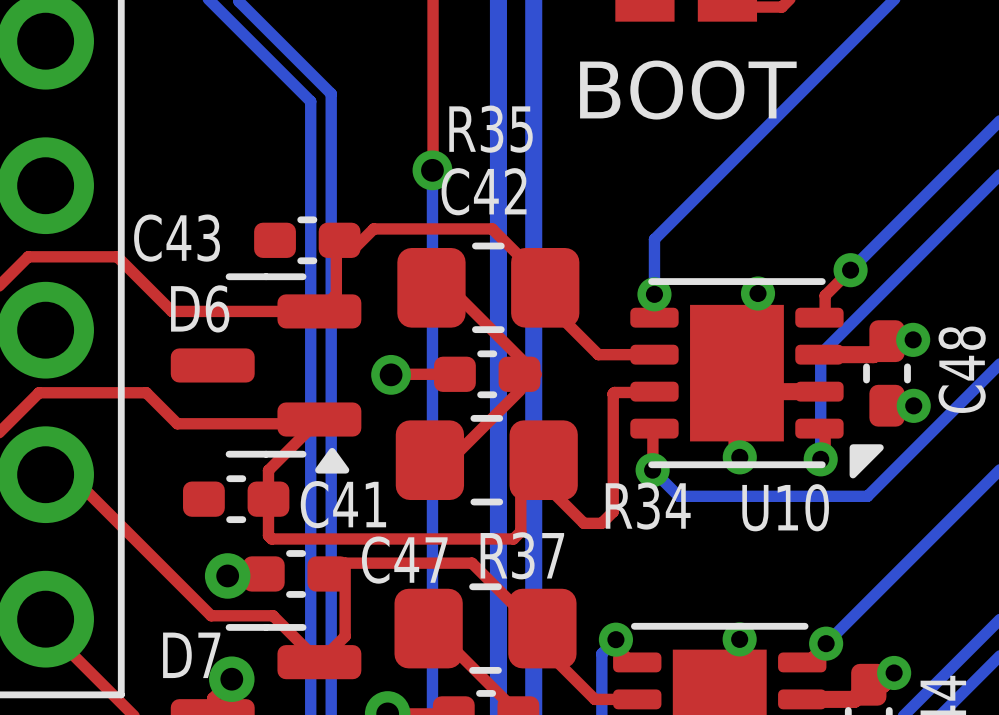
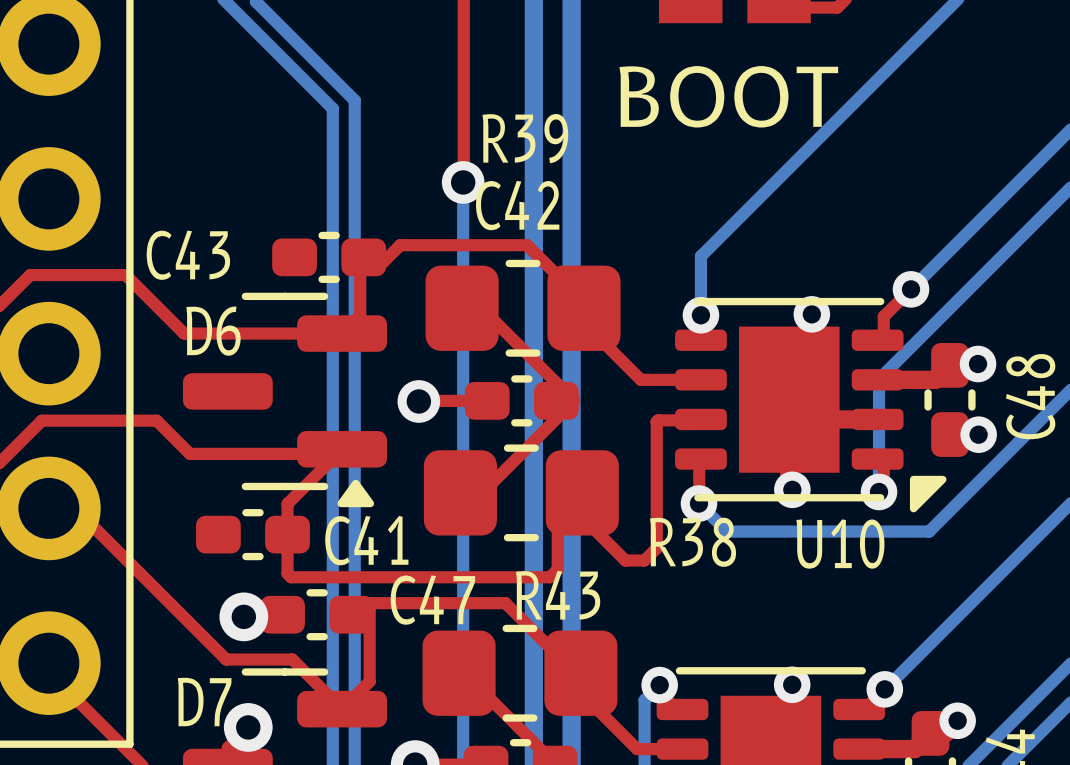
R35 name: R35 (491, 129) -> R39 (525, 138)
R34 name: R34 (648, 506) -> R38 (693, 542)
R37 name: R37 (522, 555) -> R43 (558, 595)

